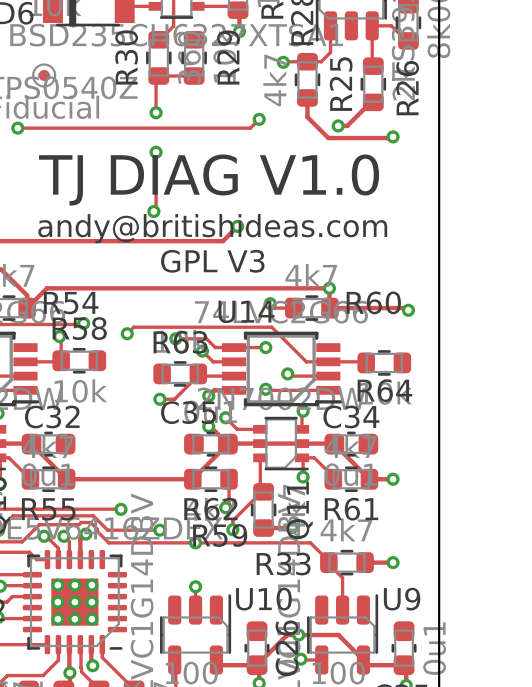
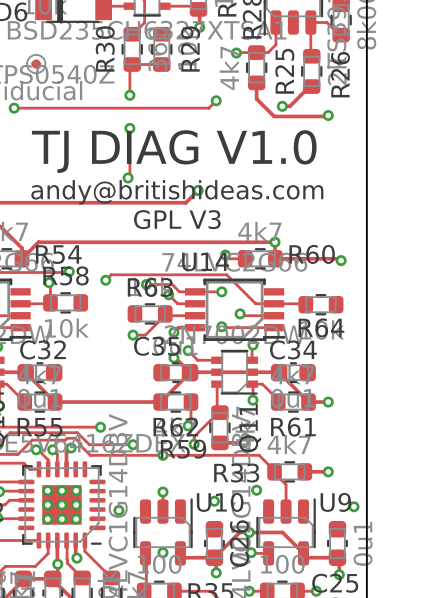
via: none -> (256, 490)
via: none -> (214, 501)
via: none -> (354, 506)
via: none -> (118, 510)
via: none -> (162, 552)

